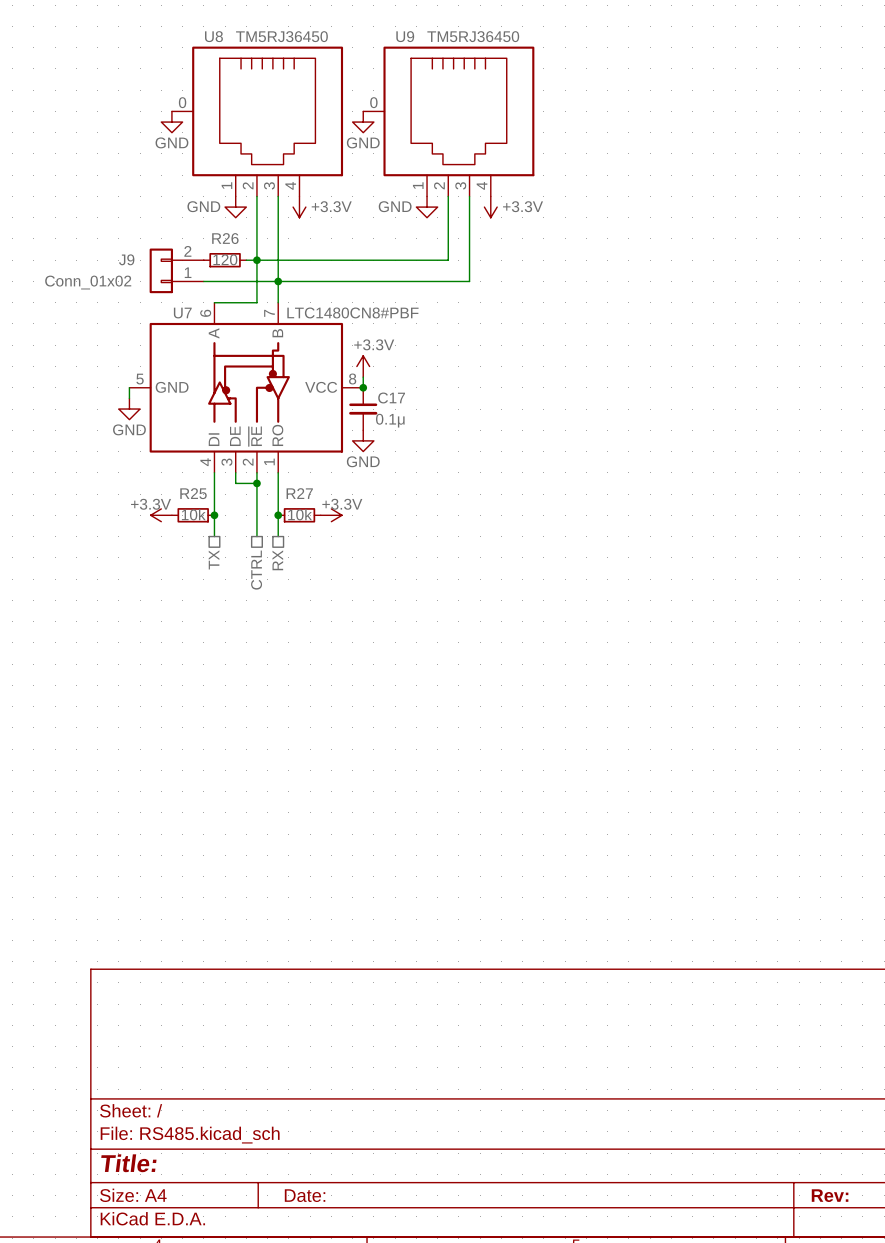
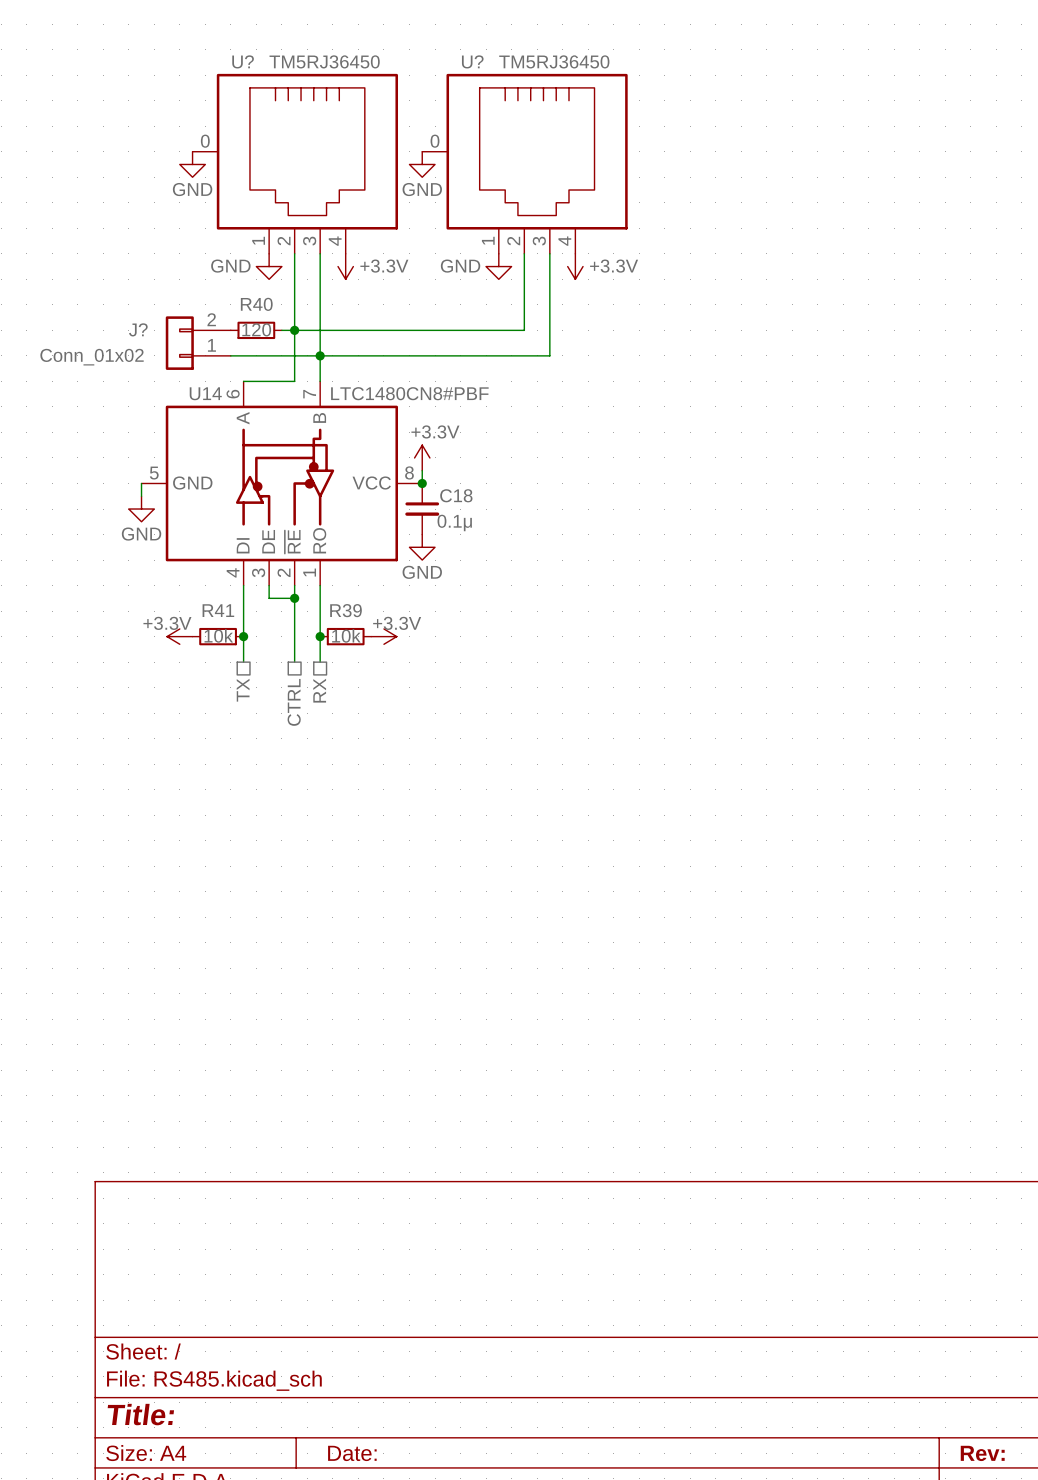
U8 name: U8 (213, 36) -> U? (243, 61)
U9 name: U9 (405, 36) -> U? (472, 61)
R26 name: R26 (225, 238) -> R40 (256, 304)
J9 name: J9 (126, 259) -> J? (138, 329)
U7 name: U7 (182, 313) -> U14 (205, 393)
C17 name: C17 (391, 397) -> C18 (456, 495)
R25 name: R25 (193, 493) -> R41 (218, 610)
R27 name: R27 (299, 493) -> R39 (346, 610)

